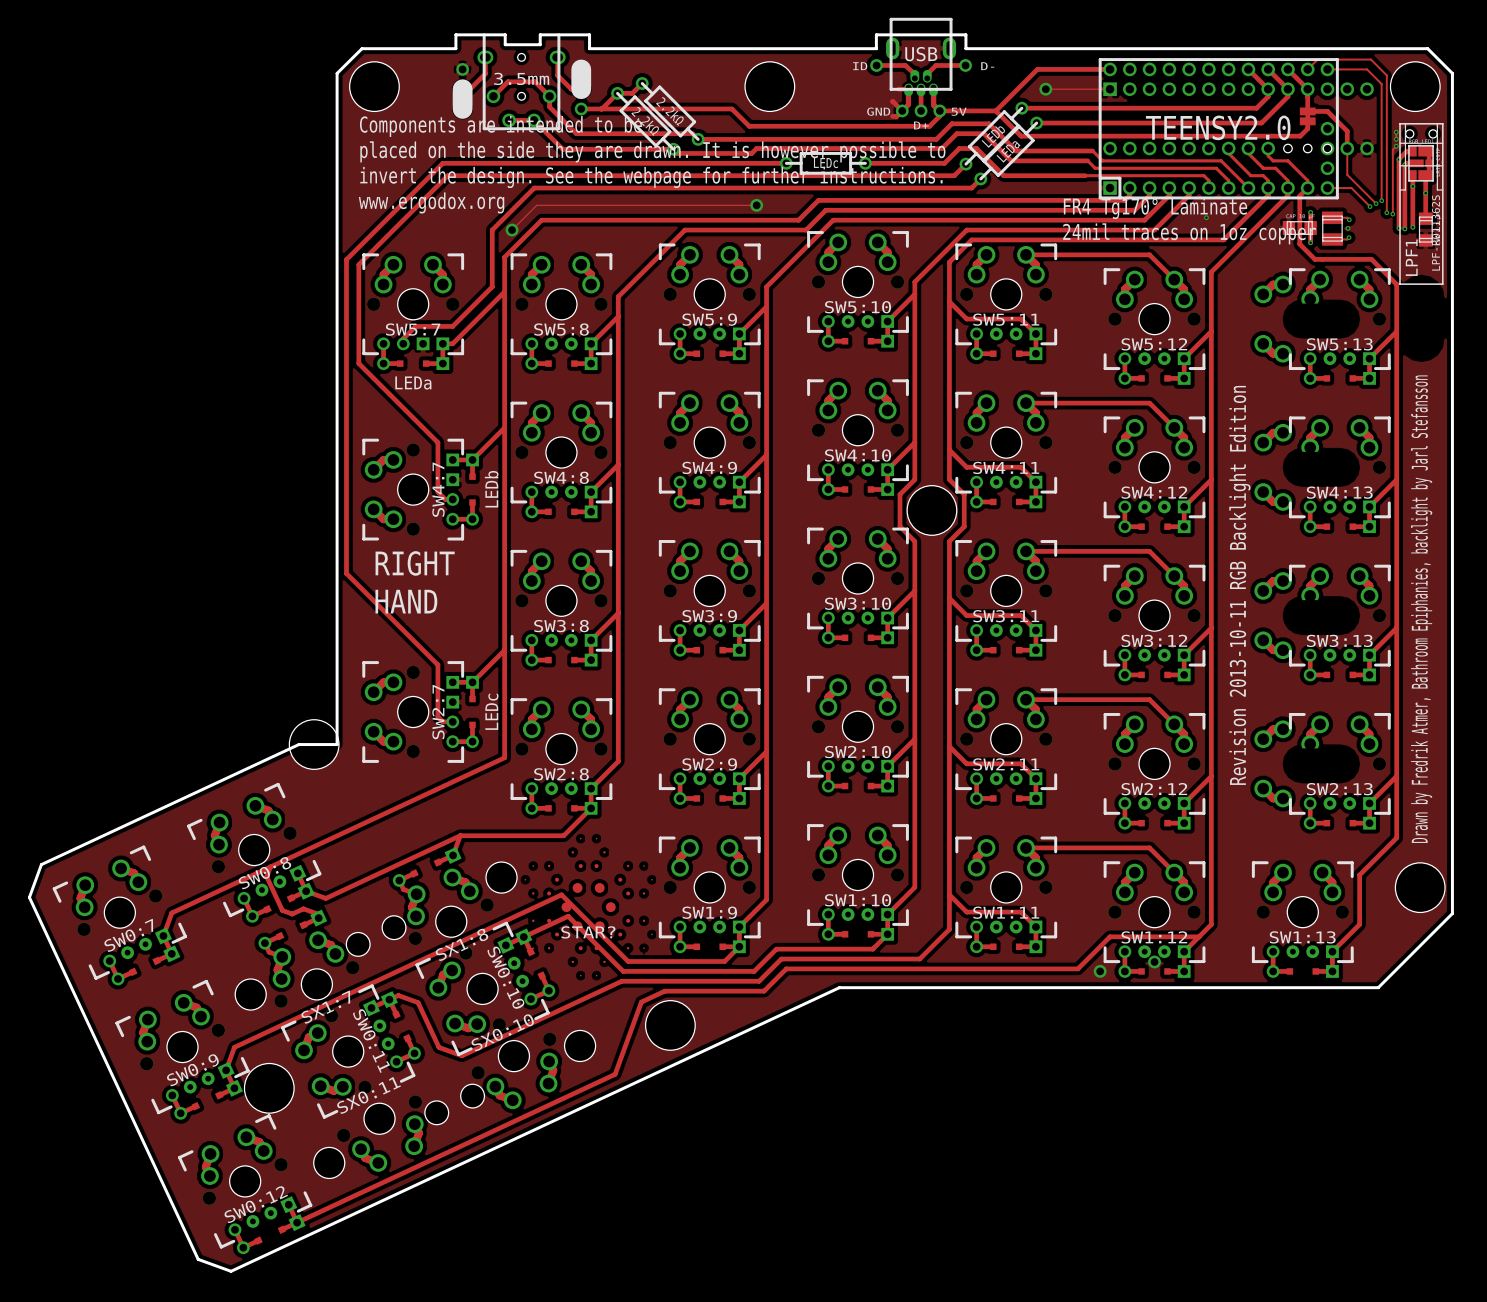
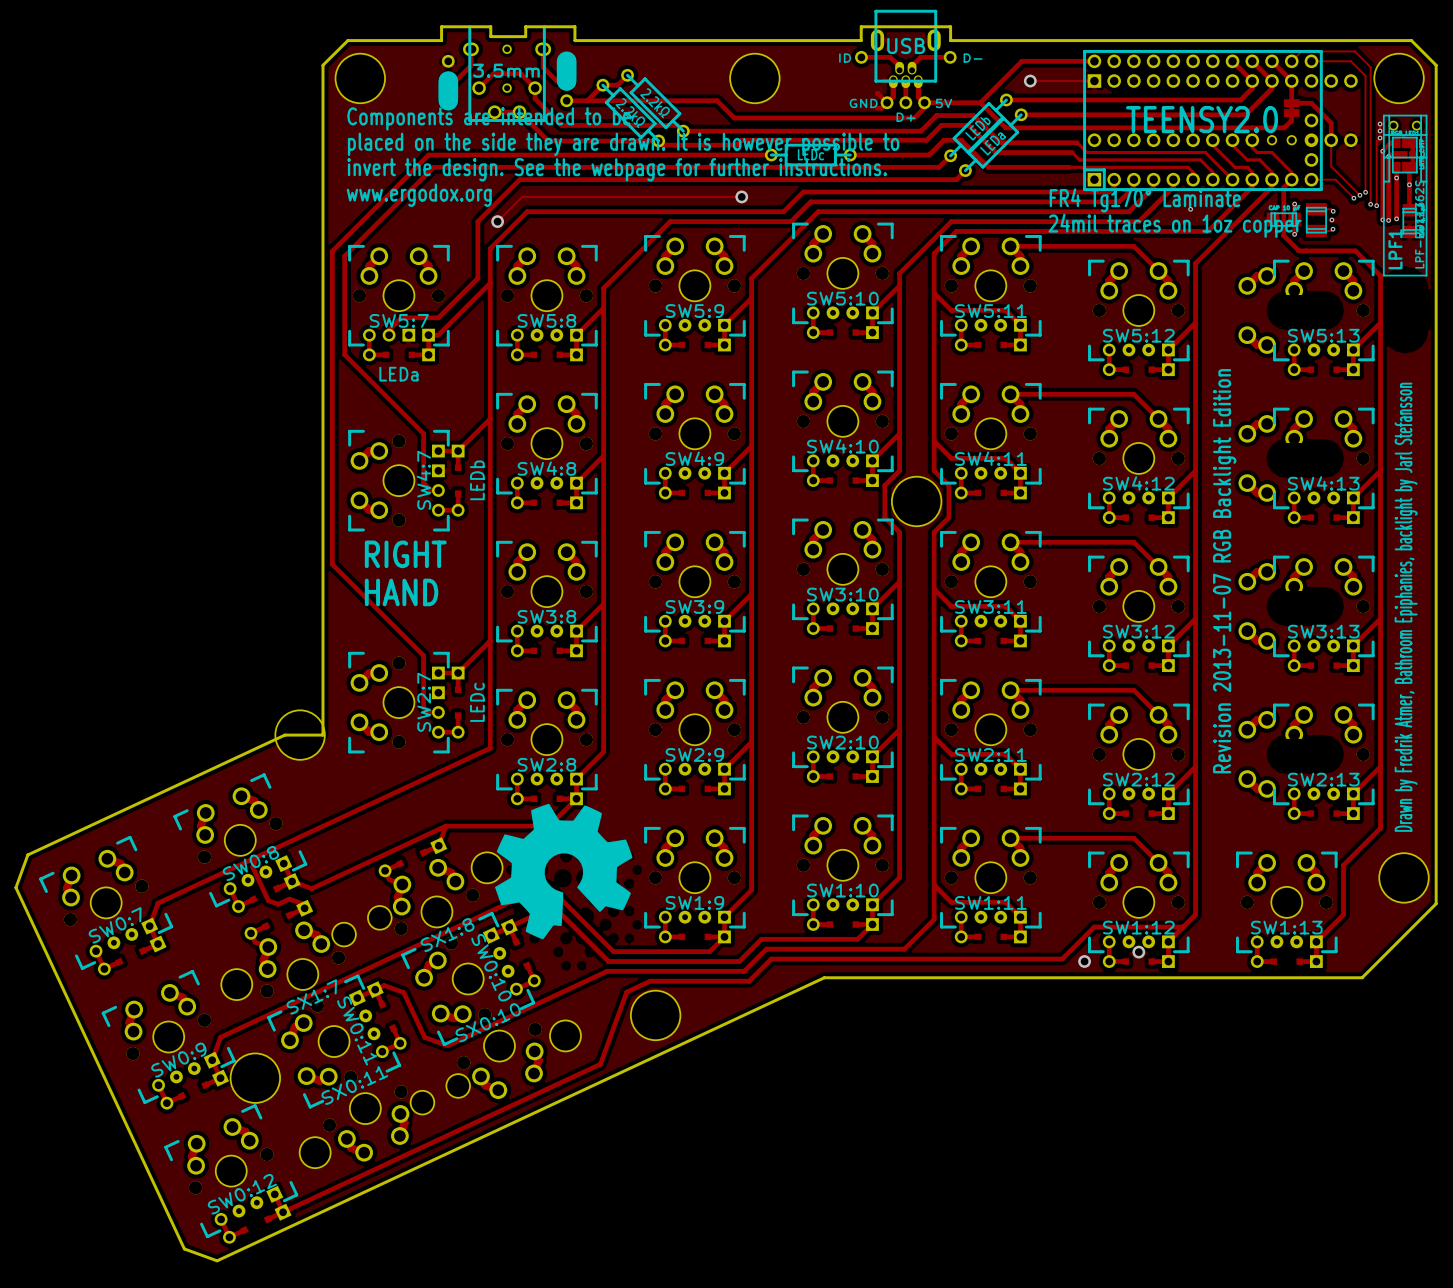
text: Revision 2013-10-11 RGB Backlight Edition (1239, 585) -> Revision 2013-11-07 RGB Backlight Edition (1224, 571)
drawing: none -> [494, 803, 633, 940]
STAR?: (588, 907) -> none

